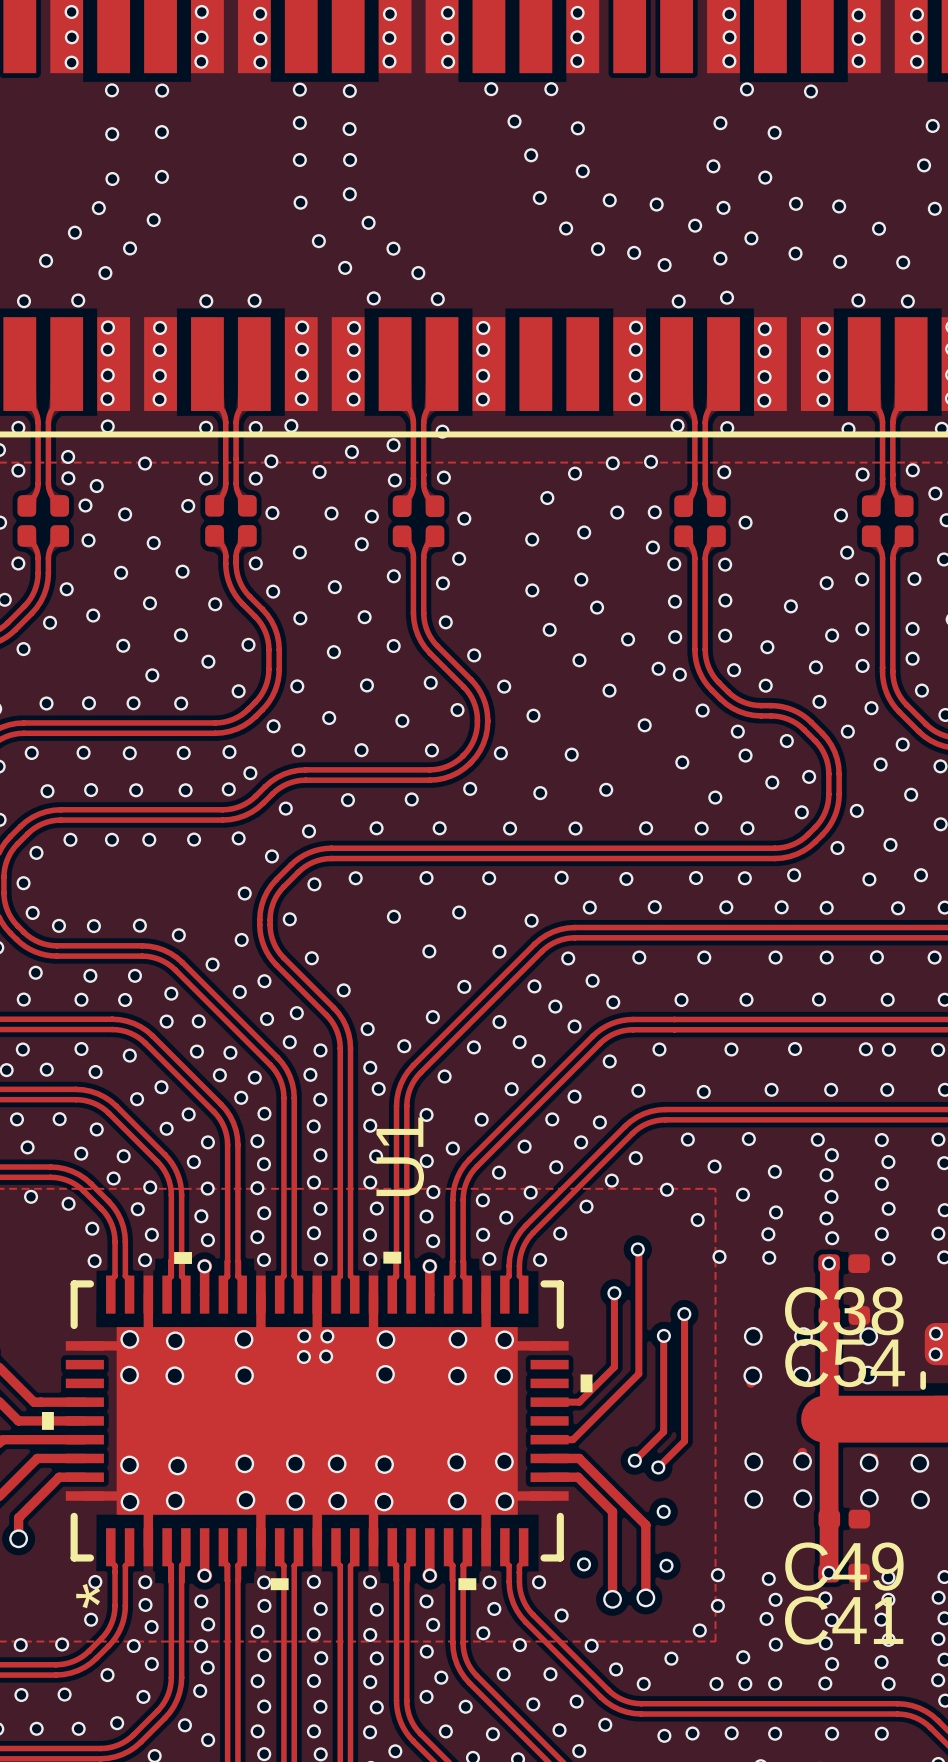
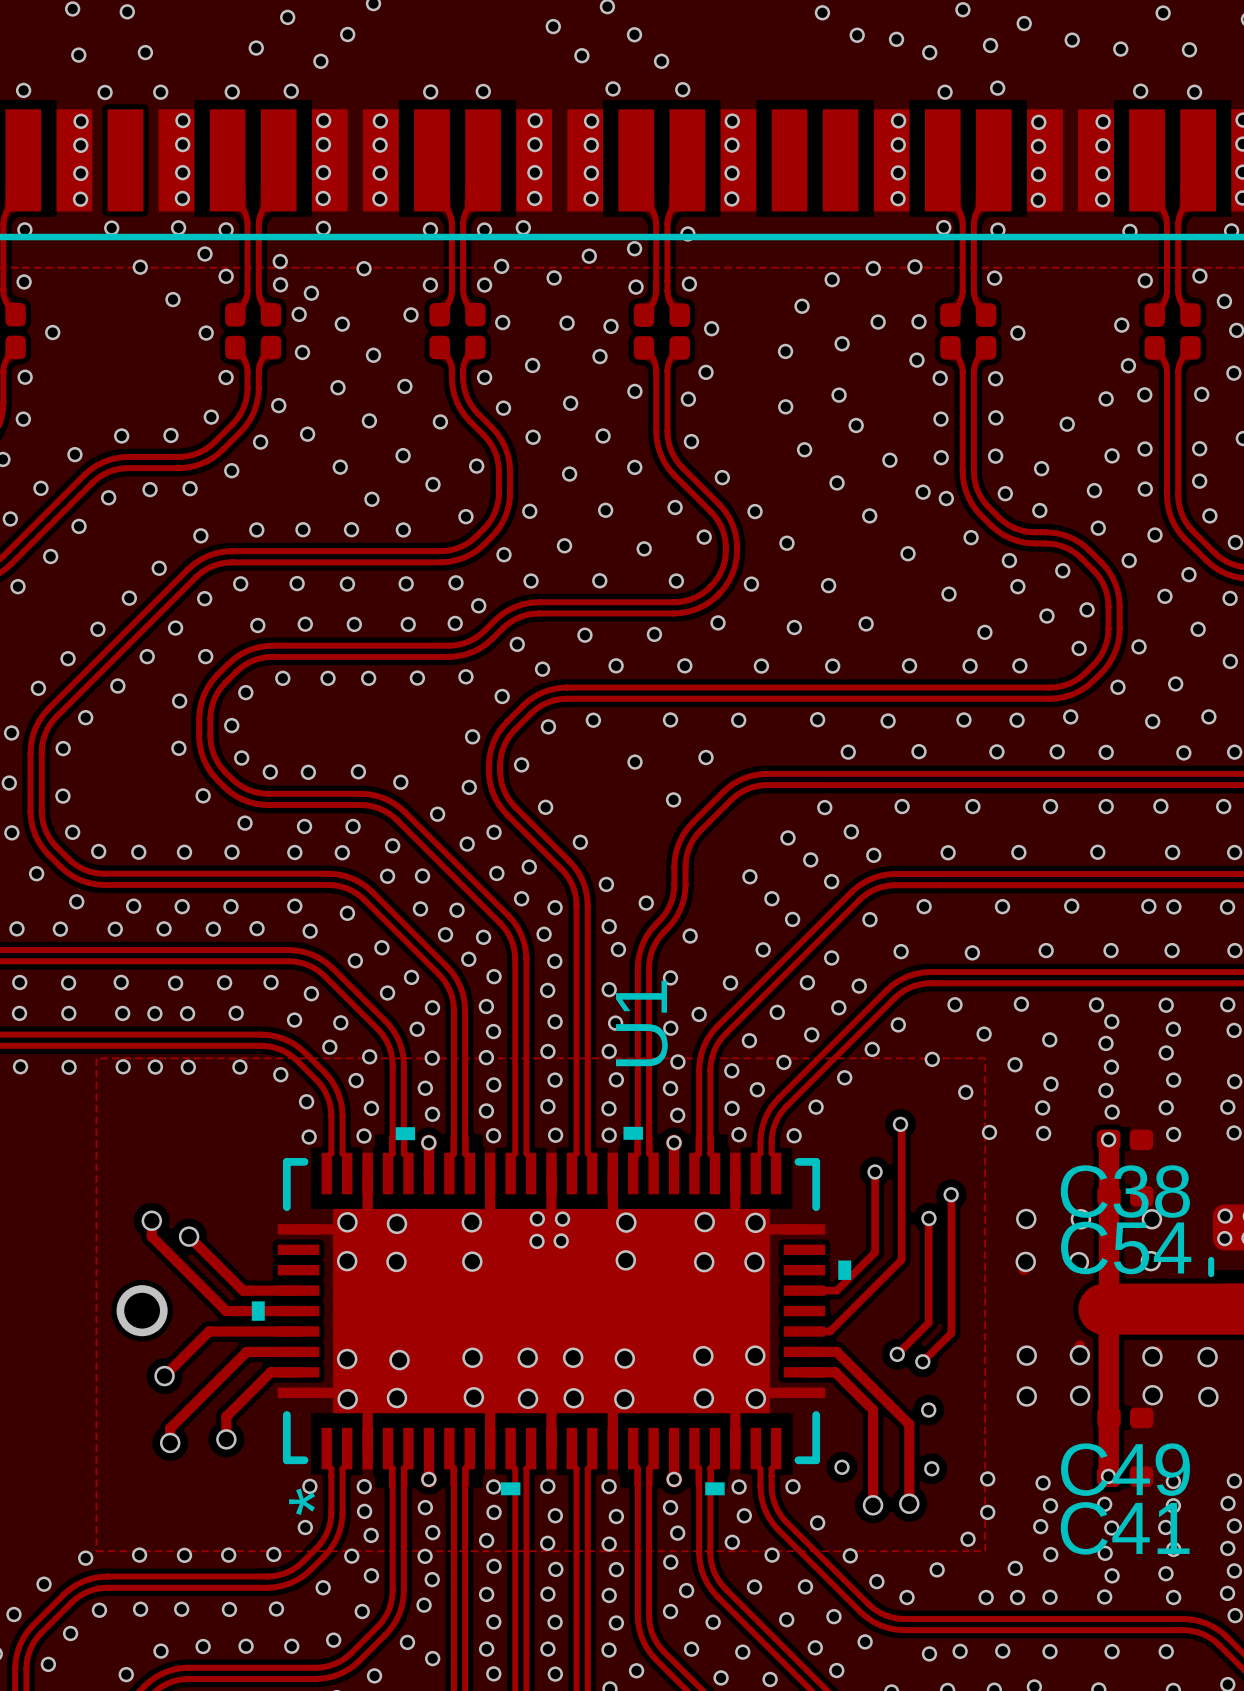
via: (531, 920) -> none
track: (575, 927) (553, 931) (540, 939) (416, 1062) -> (832, 773) (761, 774) (743, 778) (727, 788) (692, 822) (682, 835) (674, 858) (672, 899) (659, 920)
track: (575, 937) (561, 939) (545, 948) (423, 1069) -> (832, 785) (762, 785) (747, 788) (734, 796) (700, 830) (691, 842) (685, 861) (683, 900) (677, 915) (667, 928)
via: (499, 951) -> none
via: (464, 986) -> none
via: (432, 1017) -> none
via: (473, 1047) -> none

